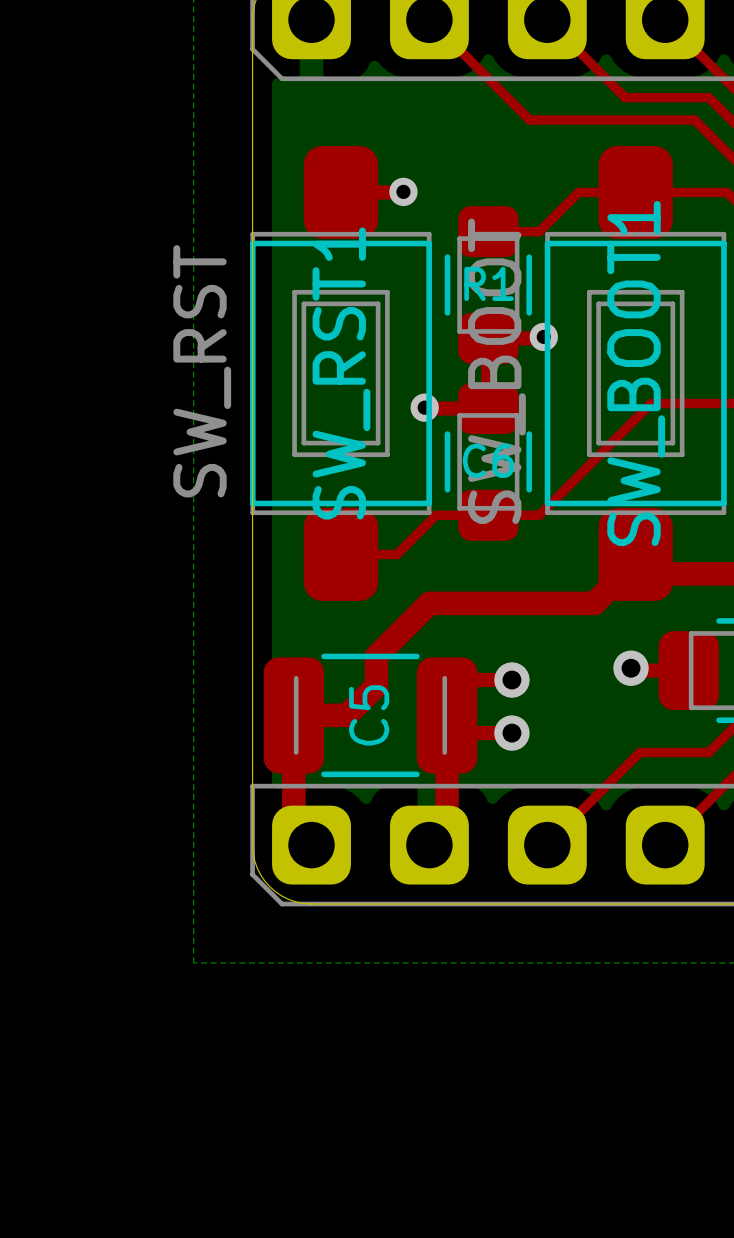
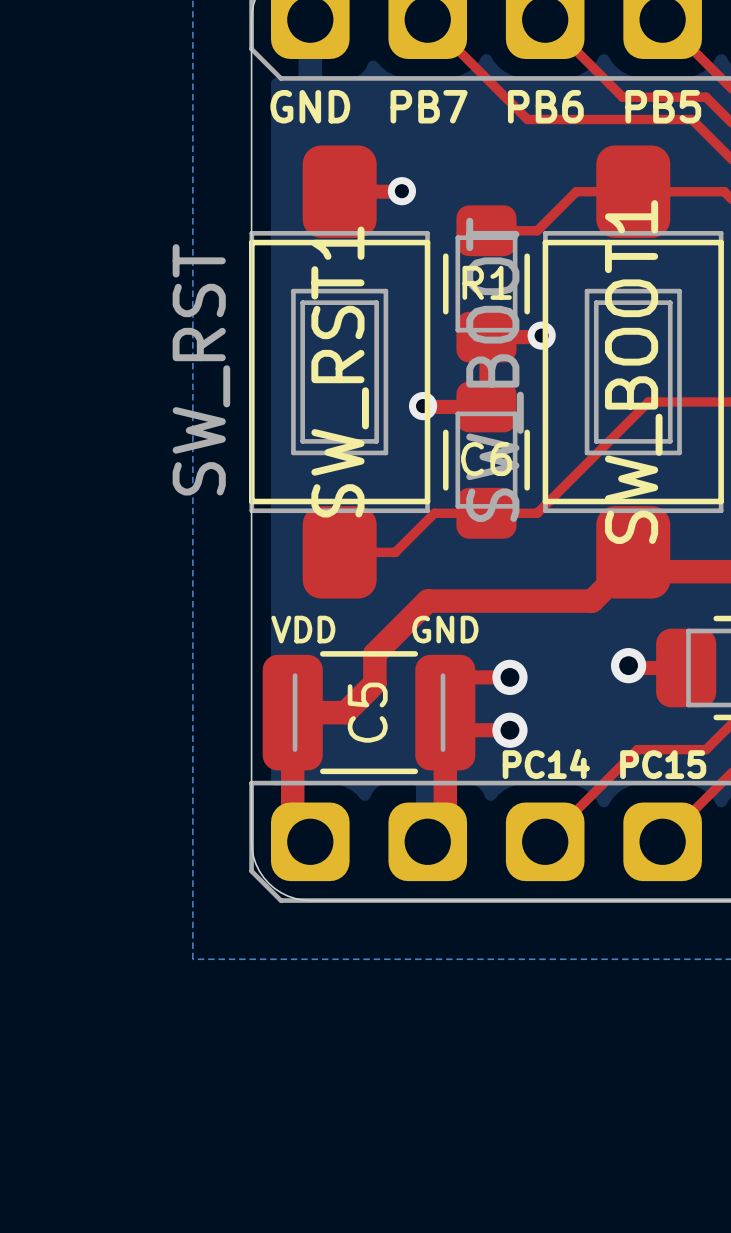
text: none -> GND (310, 106)
text: none -> PB7 (429, 106)
text: none -> PB6 (545, 106)
text: none -> PB5 (663, 106)
text: none -> VDD (303, 629)
text: none -> GND (445, 629)
text: none -> PC14 (546, 764)
text: none -> PC15 (663, 764)

